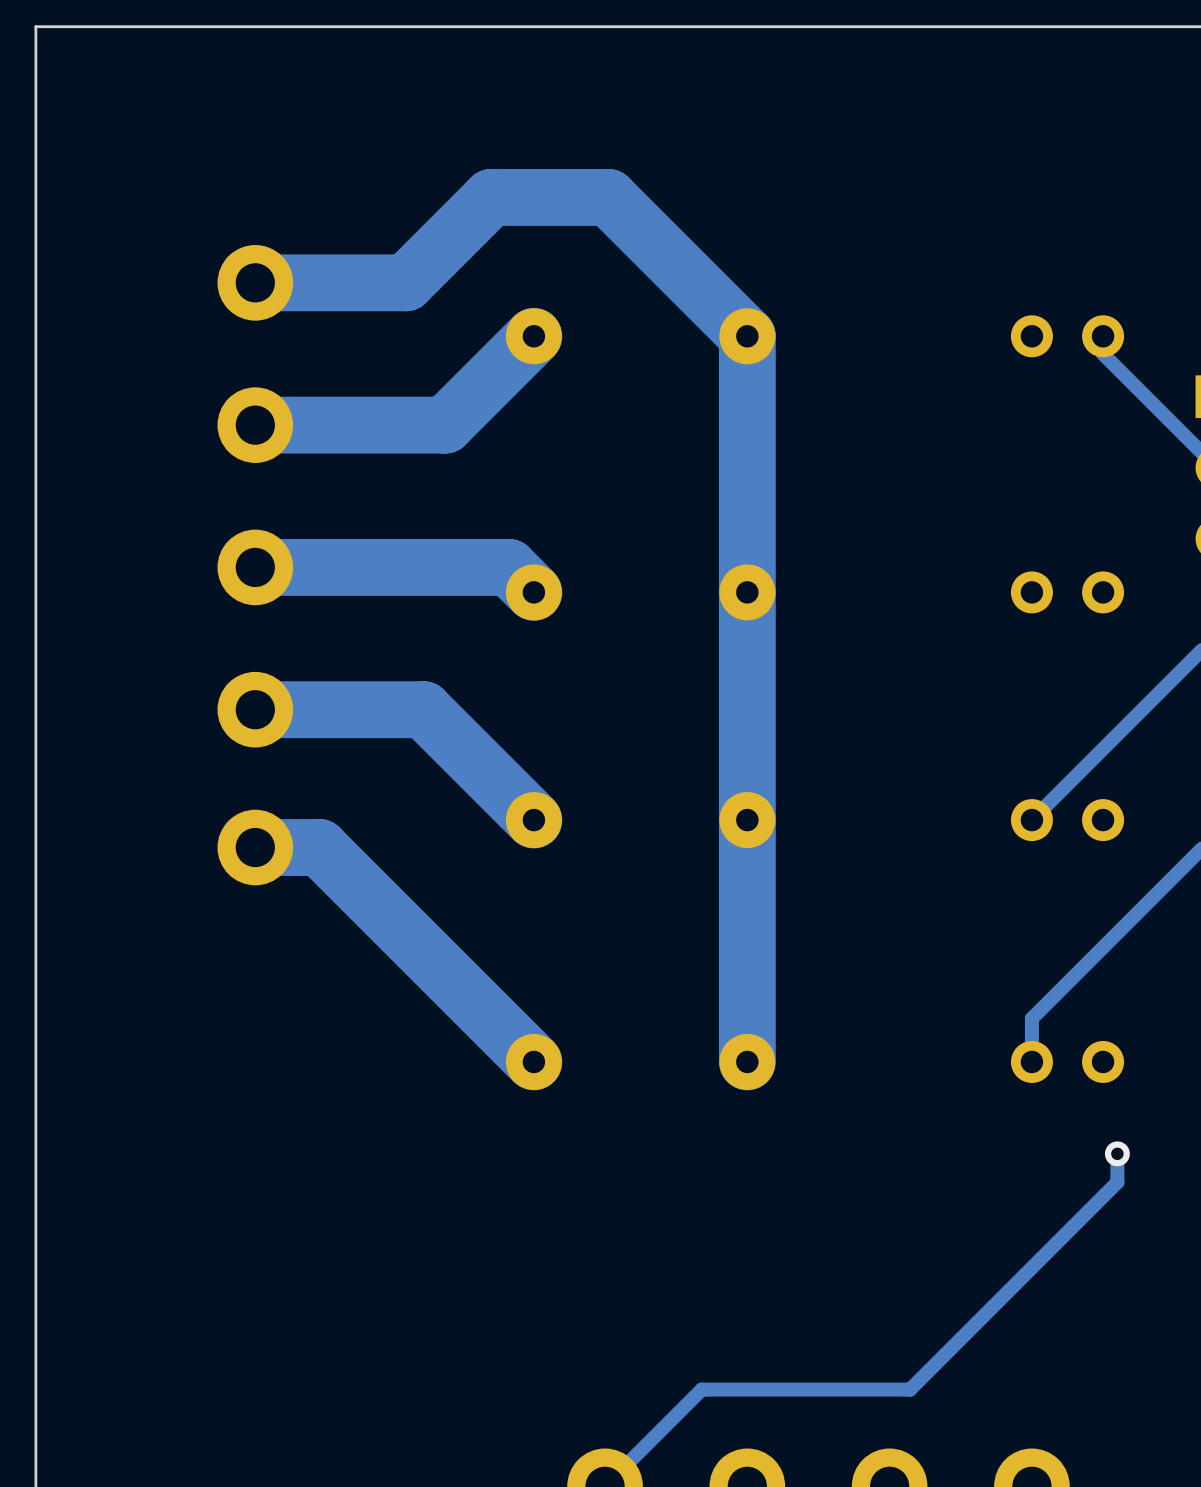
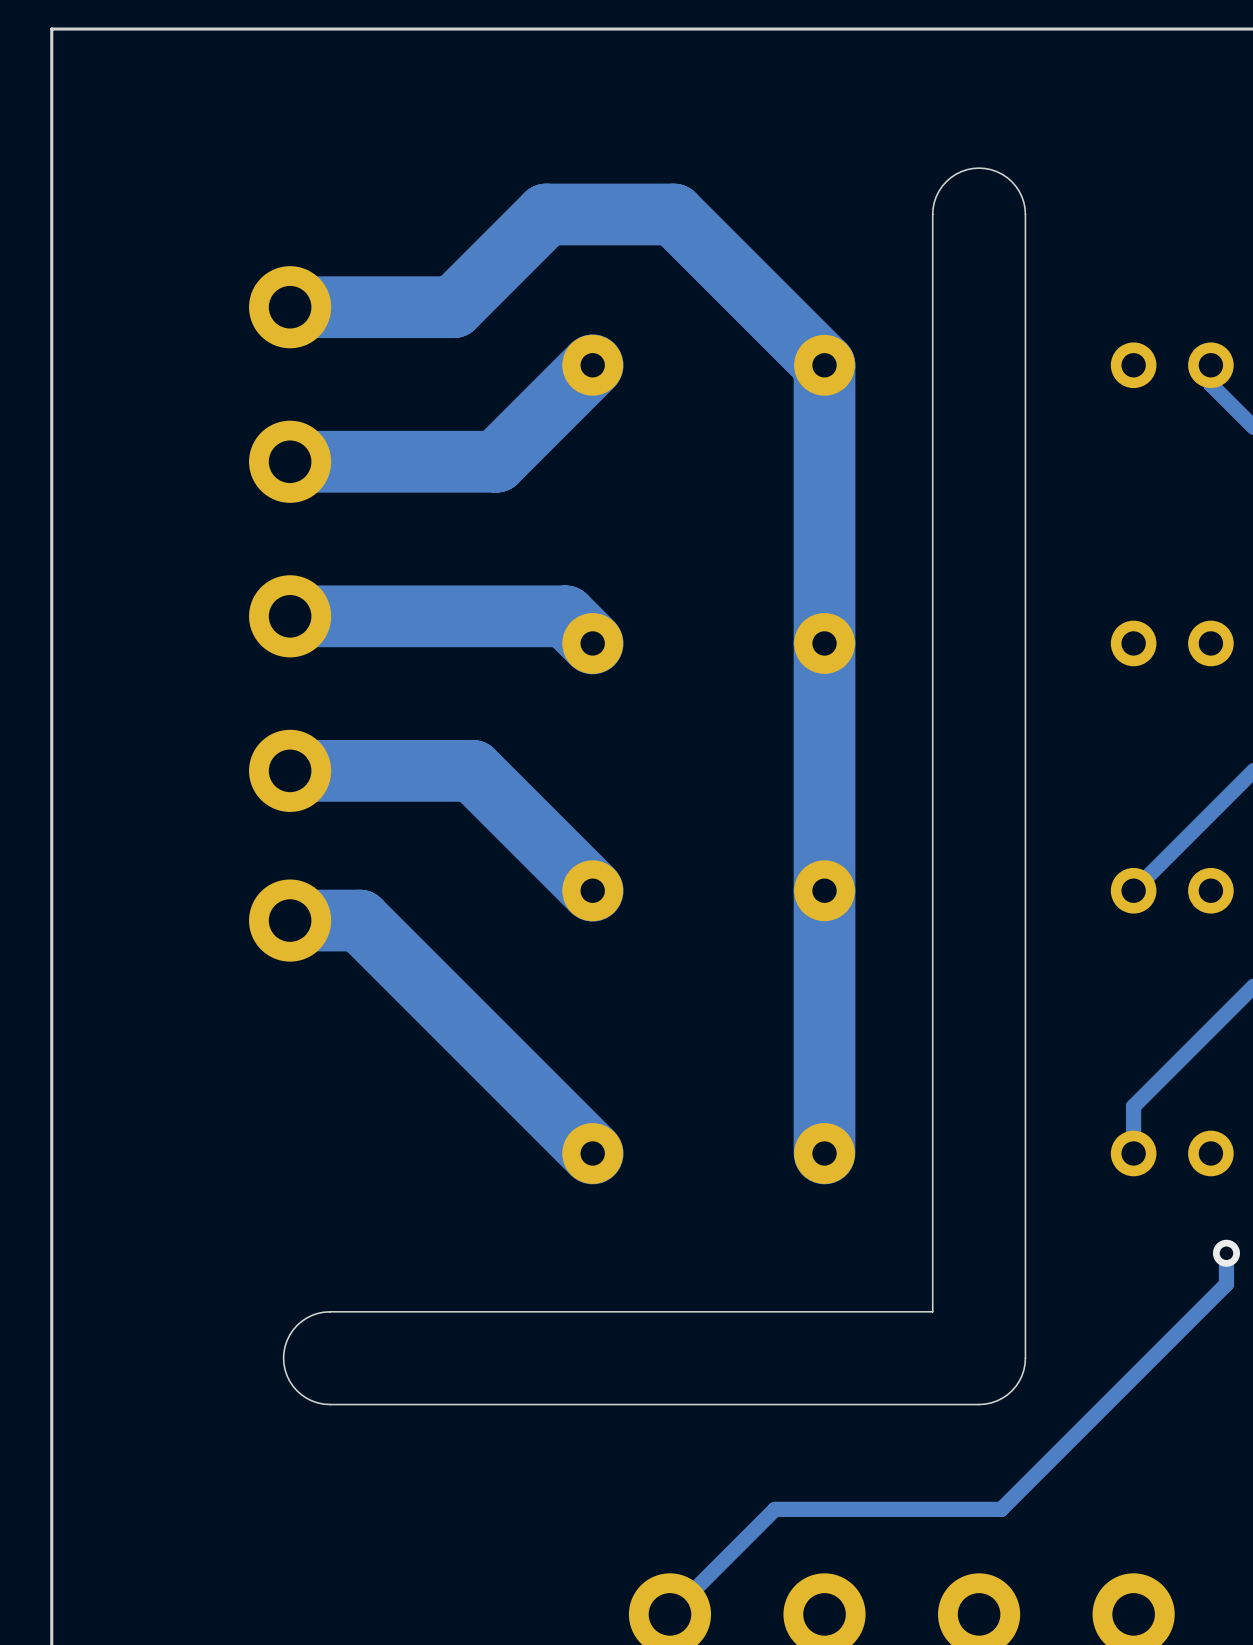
board edge: none -> (1025, 214) (1025, 1358) (1023, 1370) (1019, 1381) (1011, 1390) (1002, 1398) (991, 1402) (979, 1404) (329, 1404) (317, 1402) (306, 1398) (293, 1386) (287, 1375) (283, 1364) (283, 1352) (287, 1340) (297, 1325) (312, 1315) (323, 1312) (932, 1311) (933, 208) (938, 191) (950, 177) (967, 169) (979, 168) (996, 171) (1011, 181) (1021, 196) (1025, 214)

